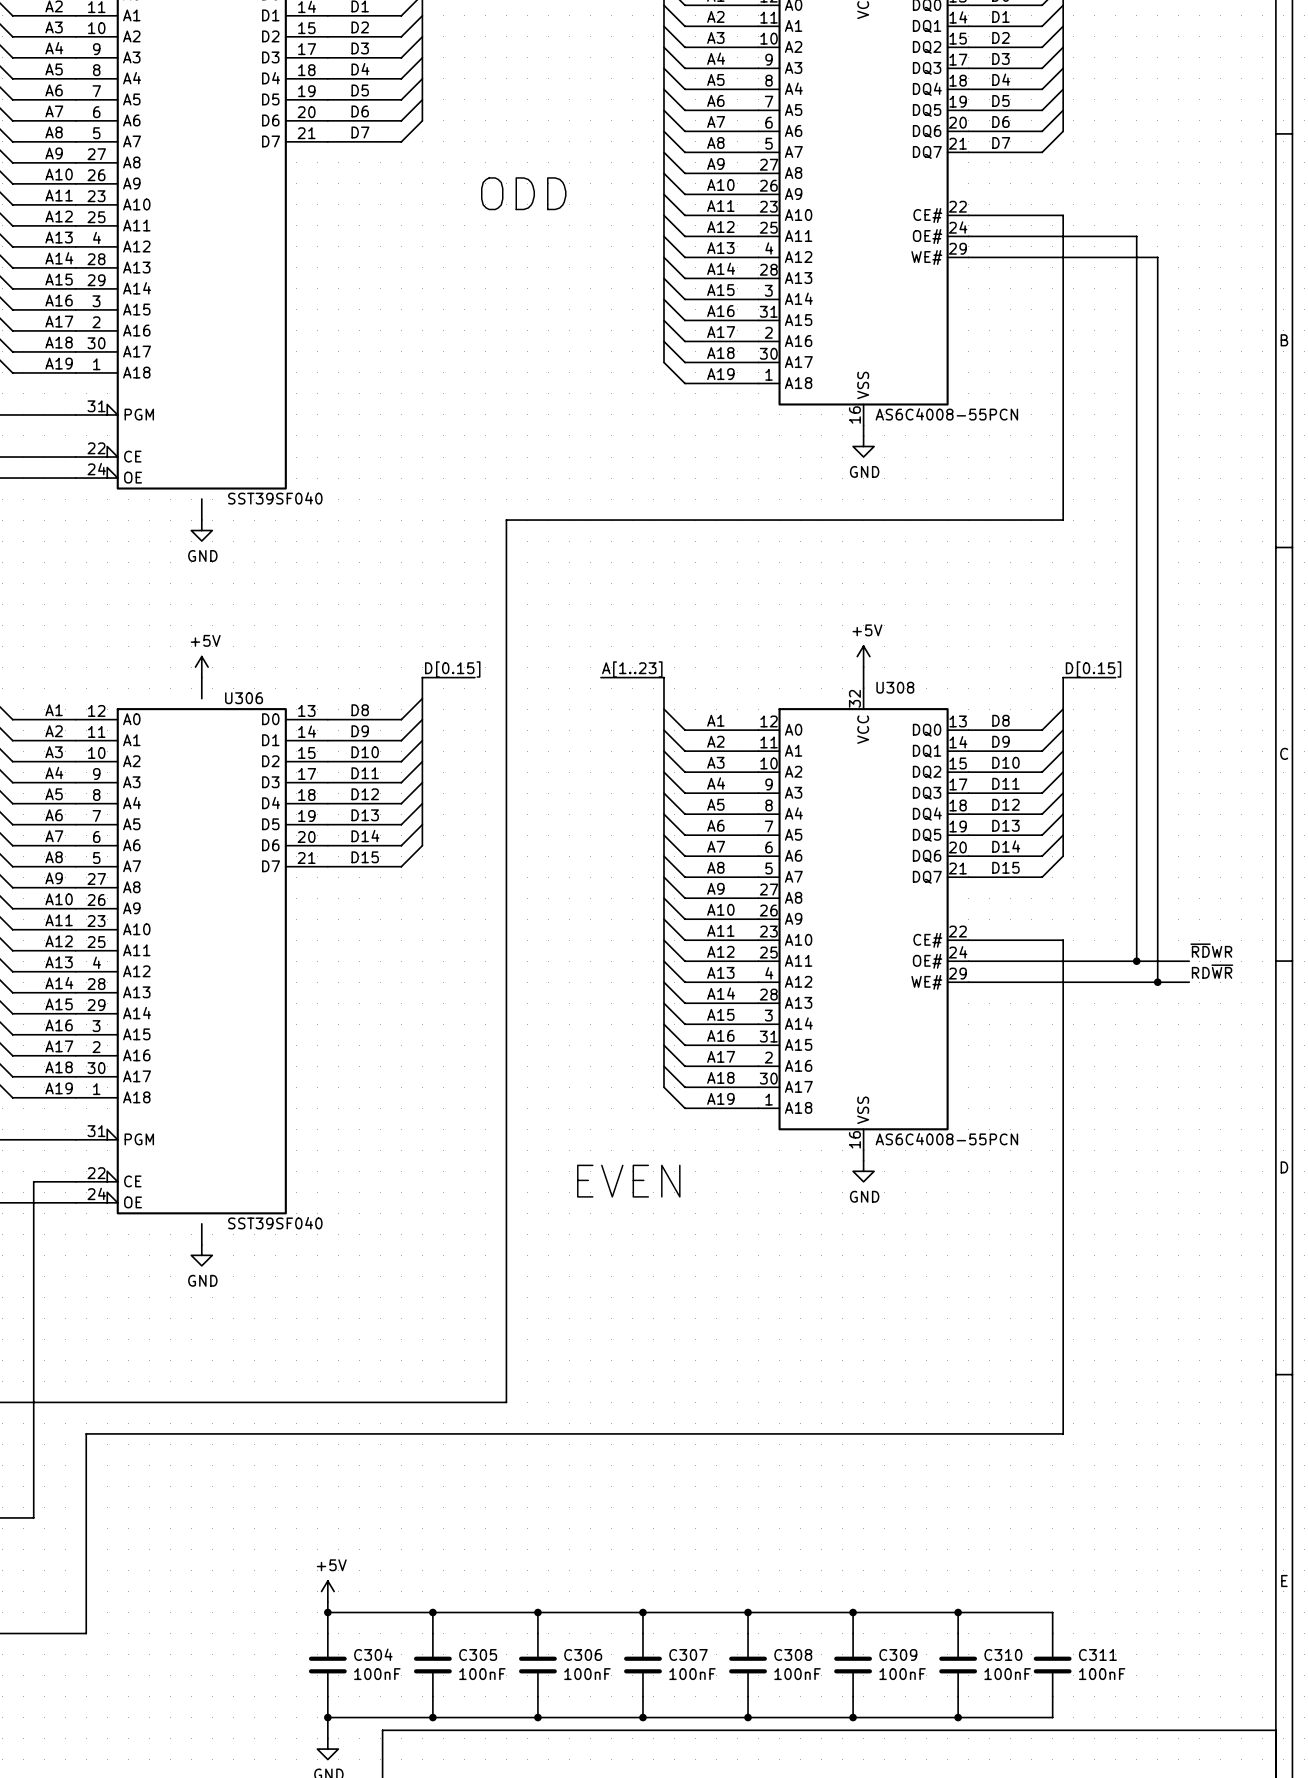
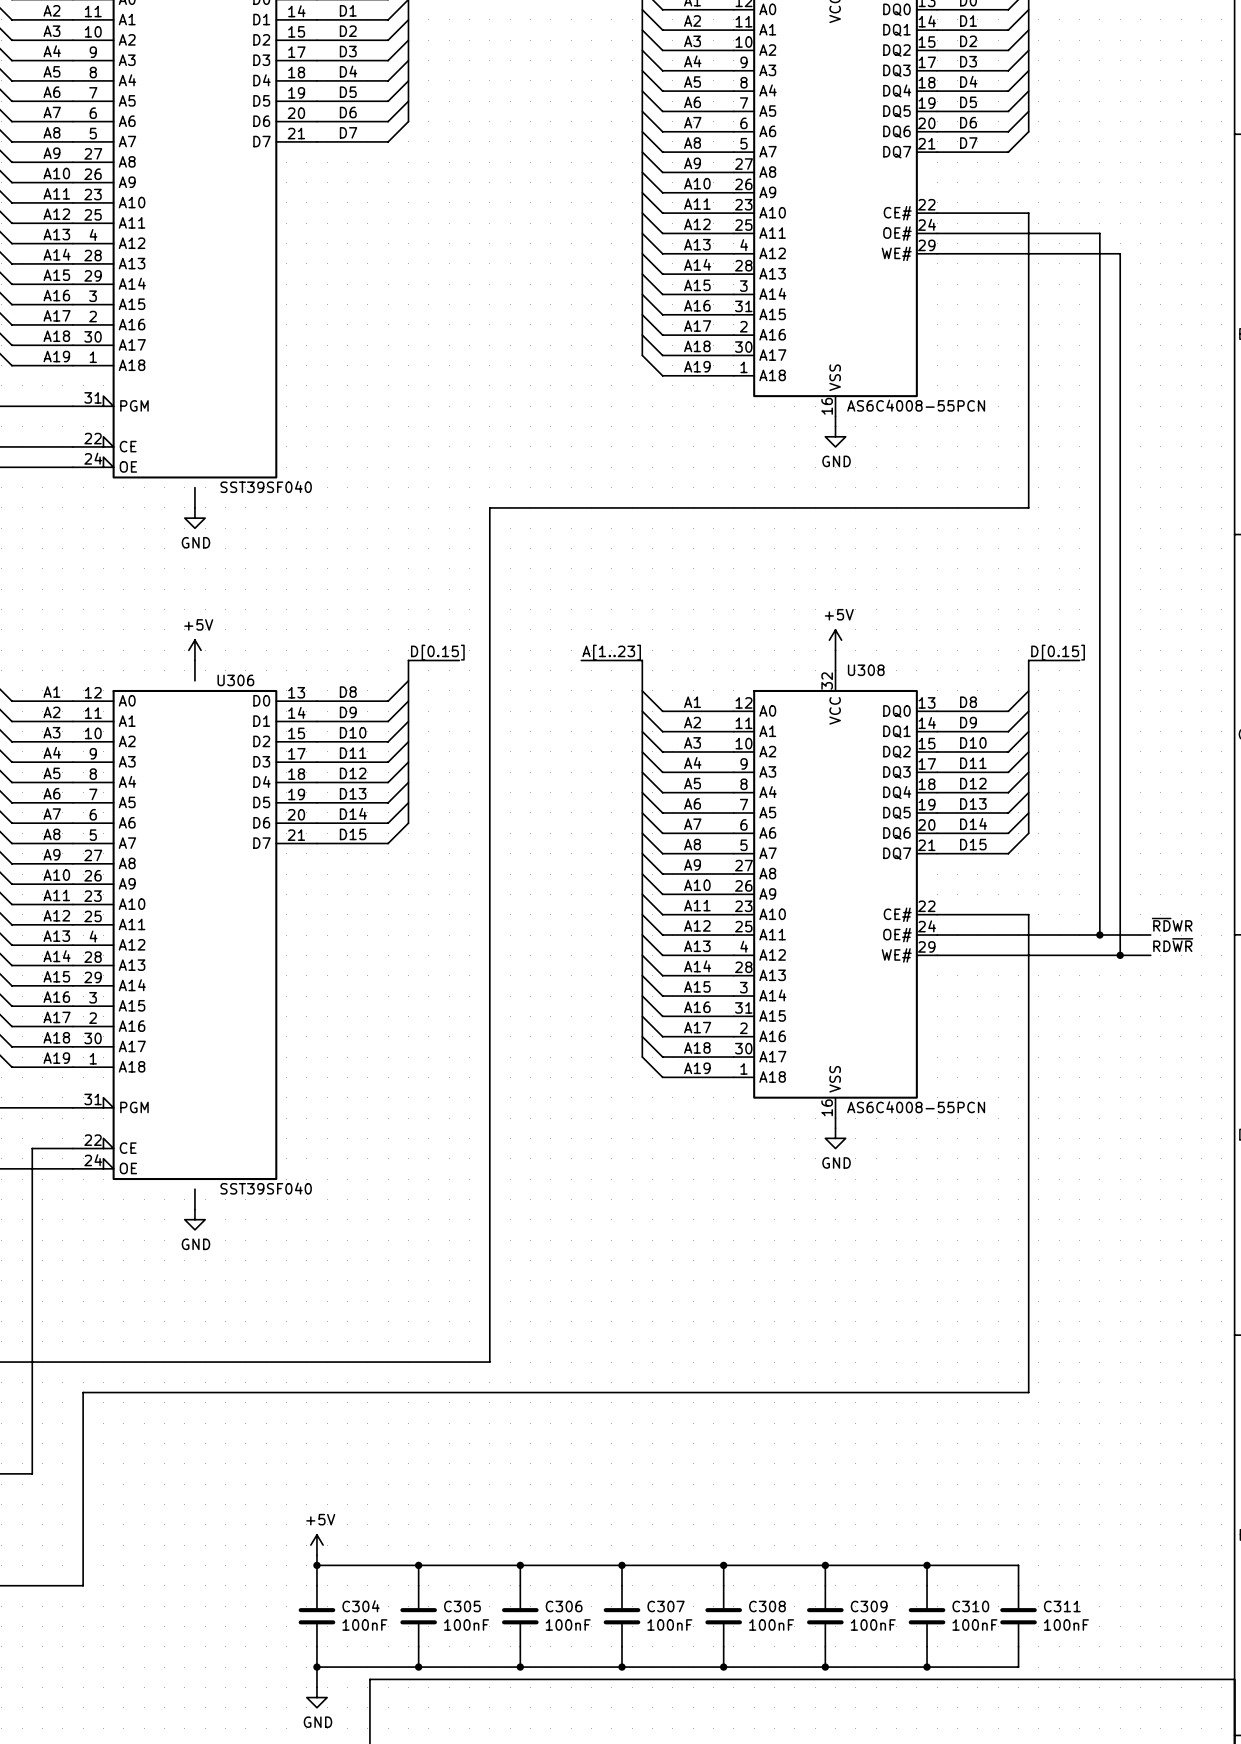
text: ODD (523, 193) -> none
text: EVEN (628, 1181) -> none

